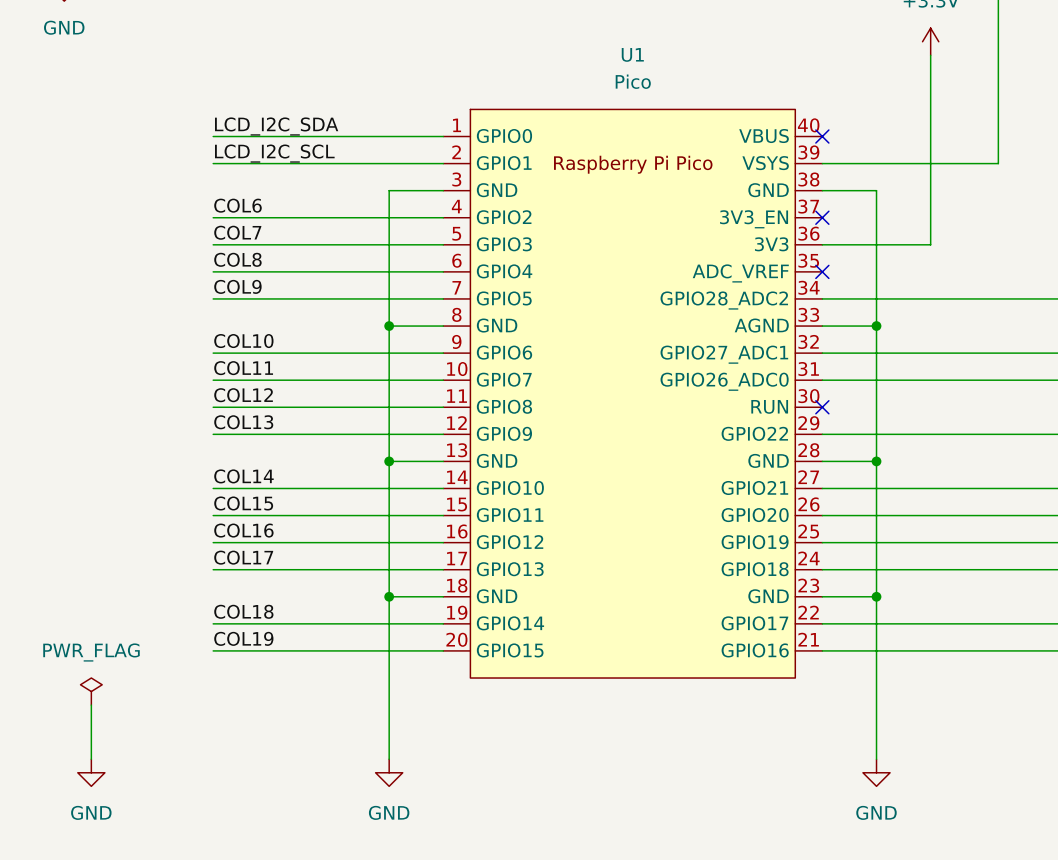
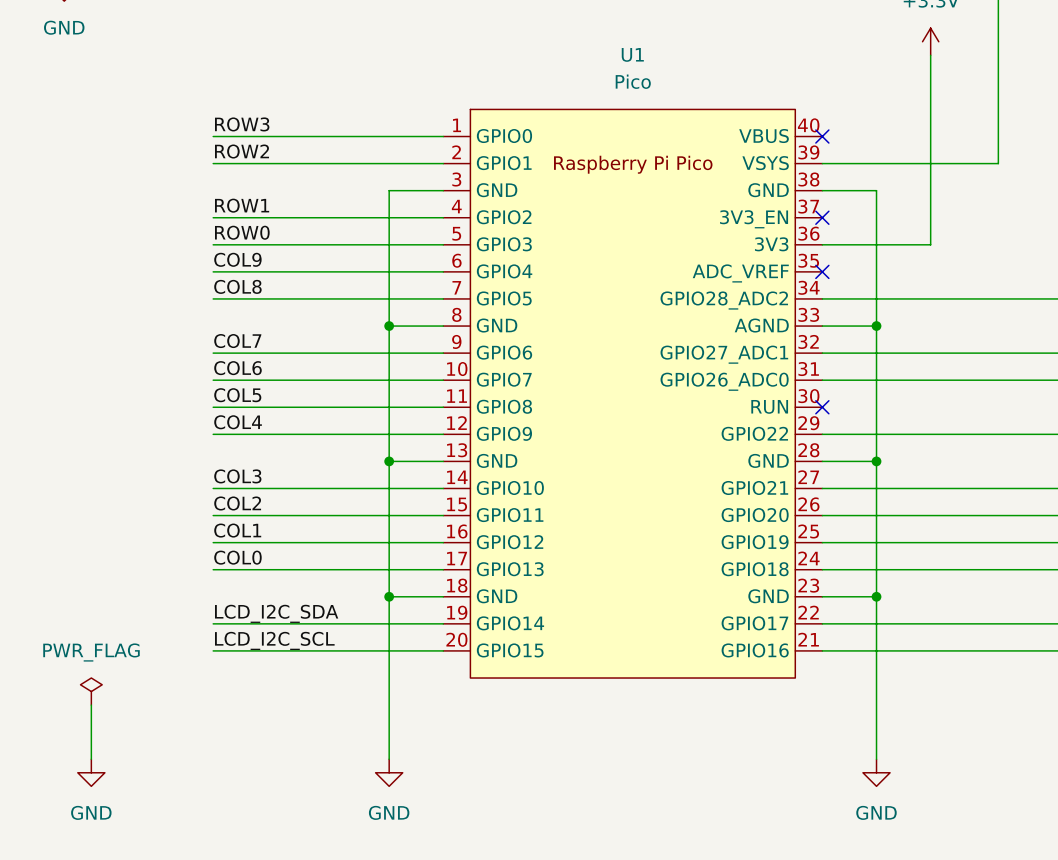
label: LCD_I2C_SDA (276, 126) -> ROW3 (242, 124)
label: LCD_I2C_SCL (274, 153) -> ROW2 (242, 151)
label: COL6 (237, 205) -> ROW1 (242, 205)
label: COL7 (237, 232) -> ROW0 (242, 232)
label: COL8 (237, 259) -> COL9 (237, 259)
label: COL9 (237, 286) -> COL8 (237, 286)
label: COL10 (243, 341) -> COL7 (237, 341)
label: COL11 (243, 368) -> COL6 (237, 368)
label: COL12 (243, 395) -> COL5 (237, 395)
label: COL13 (243, 422) -> COL4 (238, 422)
label: COL14 (243, 476) -> COL3 (237, 476)
label: COL15 (243, 503) -> COL2 (237, 503)
label: COL16 (243, 530) -> COL1 (237, 530)
label: COL17 (243, 557) -> COL0 (237, 557)
label: COL18 (243, 611) -> LCD_I2C_SDA (276, 613)
label: COL19 (243, 638) -> LCD_I2C_SCL (274, 640)

